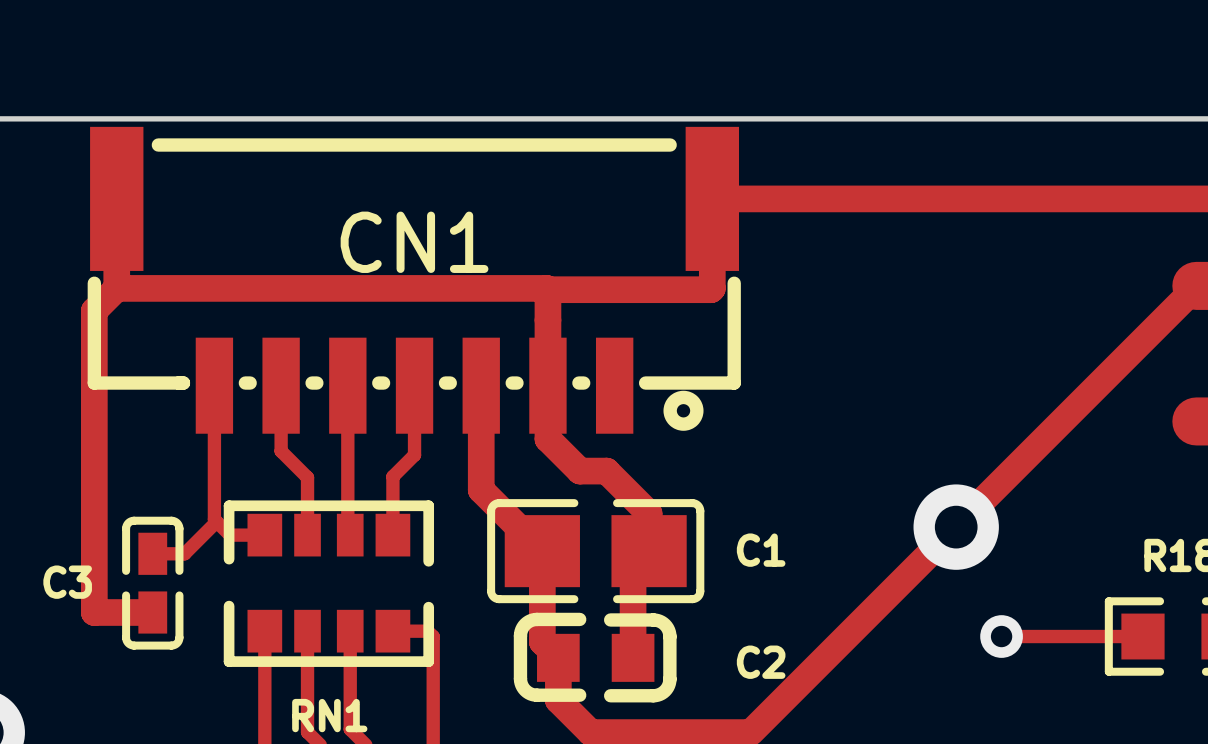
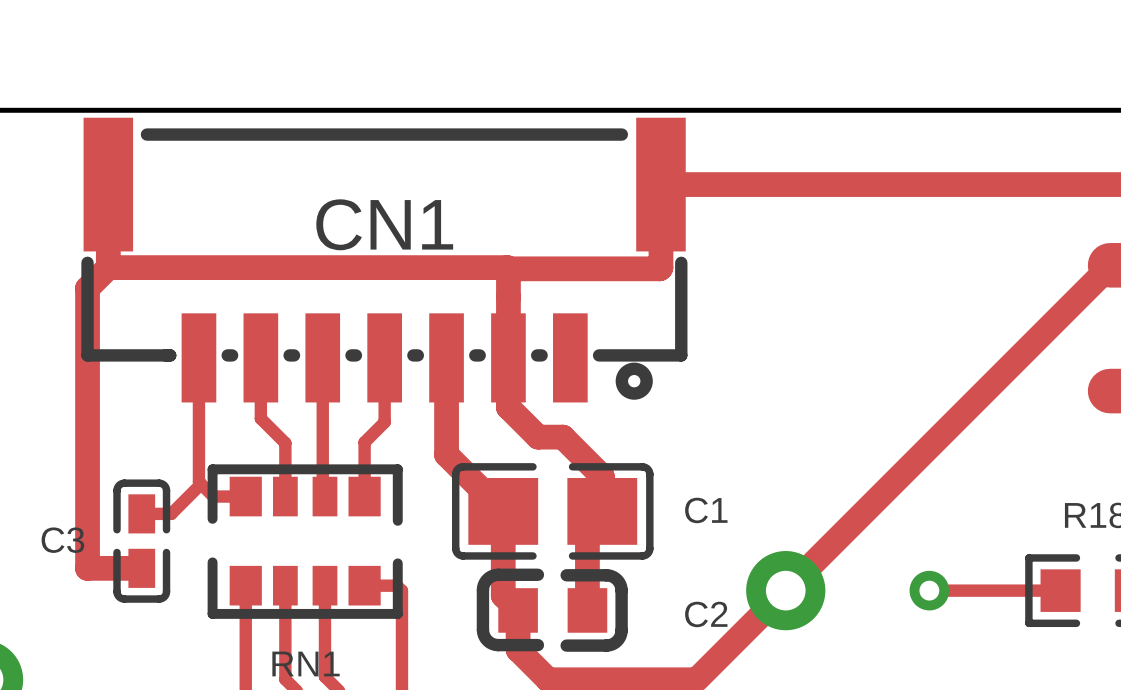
via position: (956, 527) -> (785, 590)

